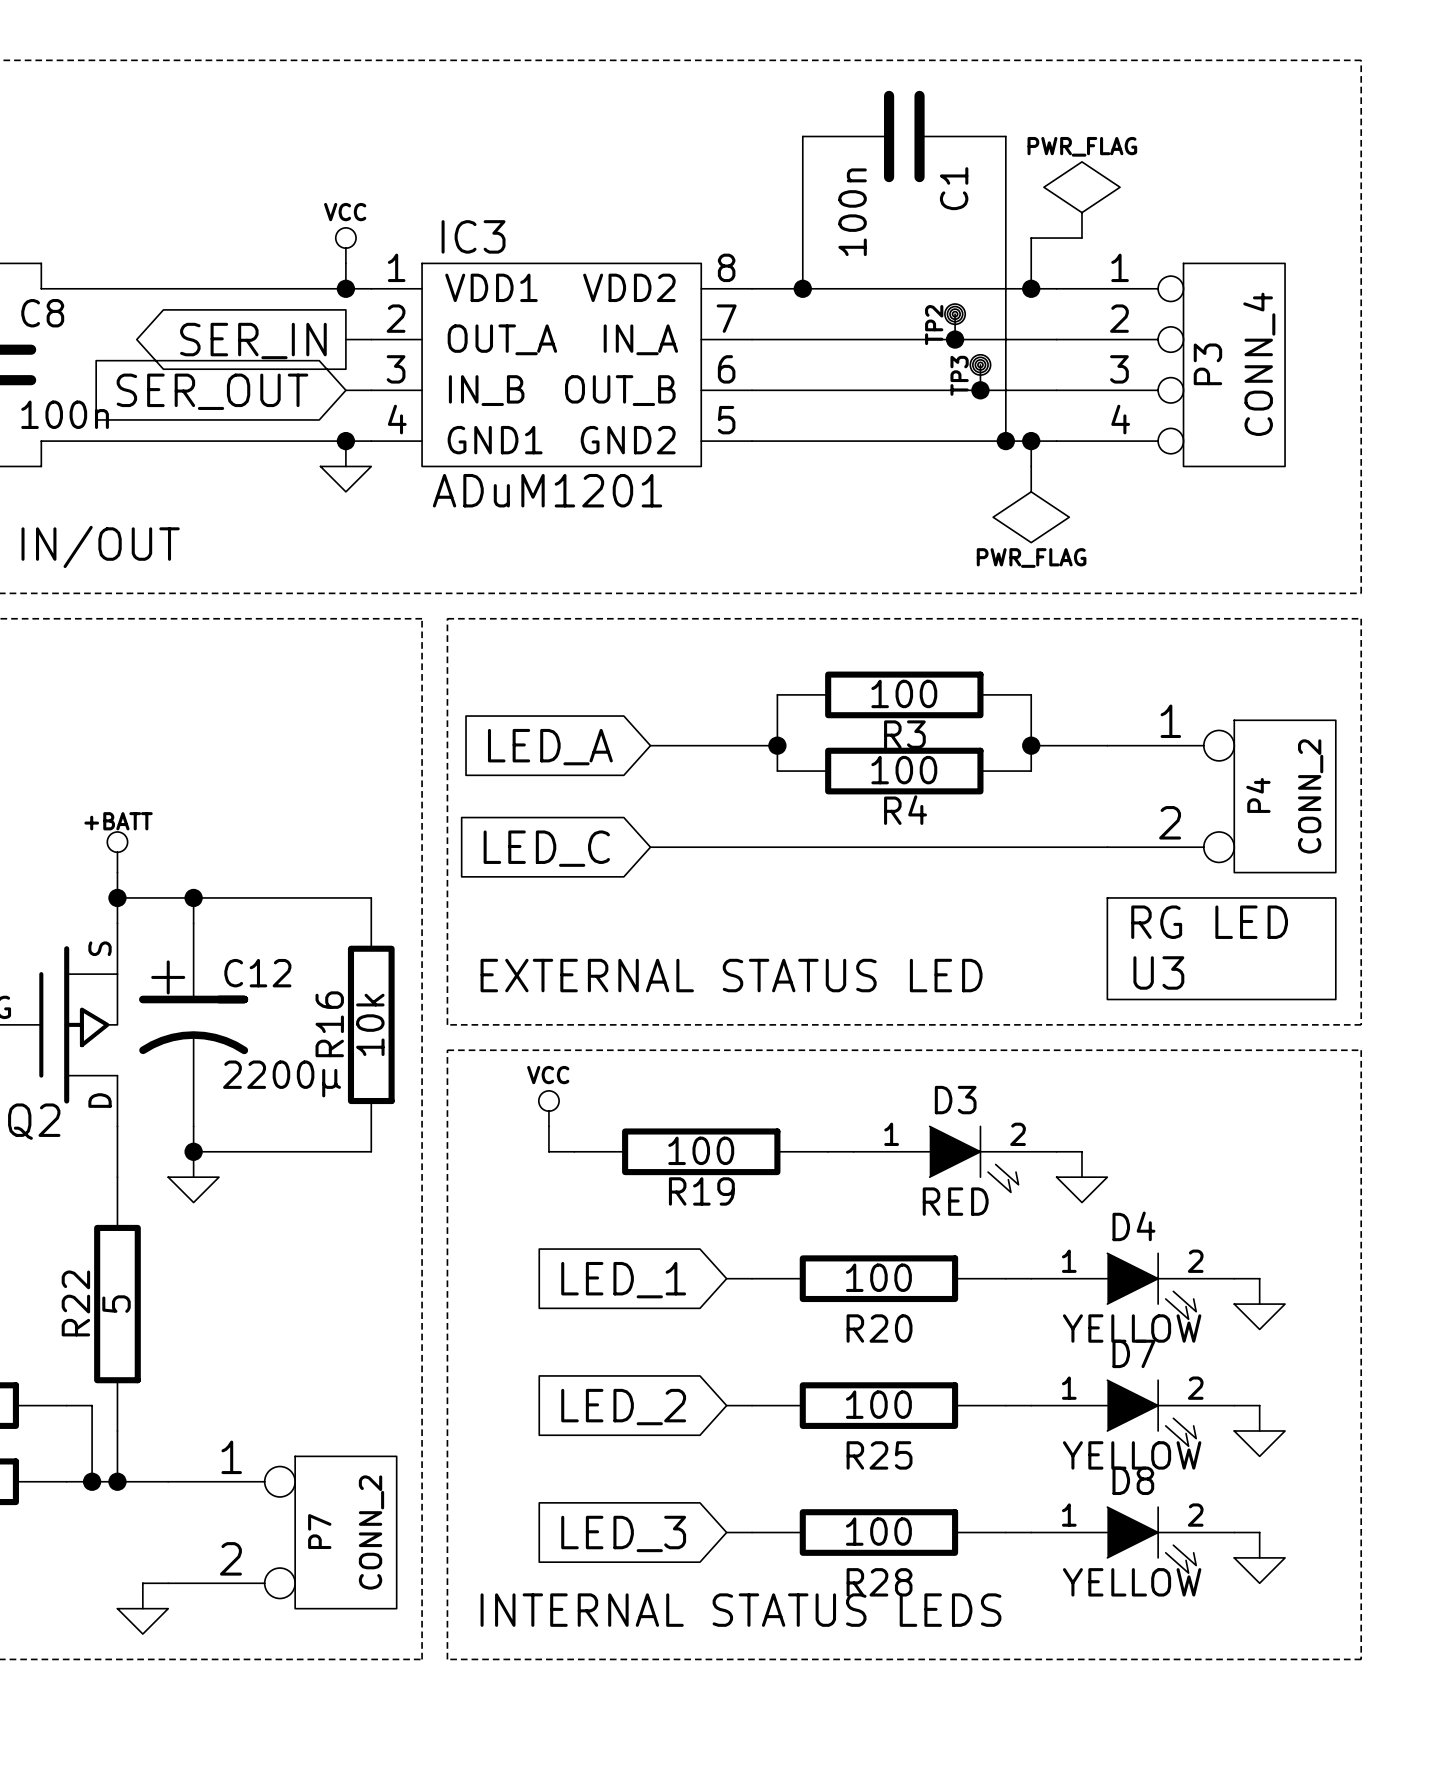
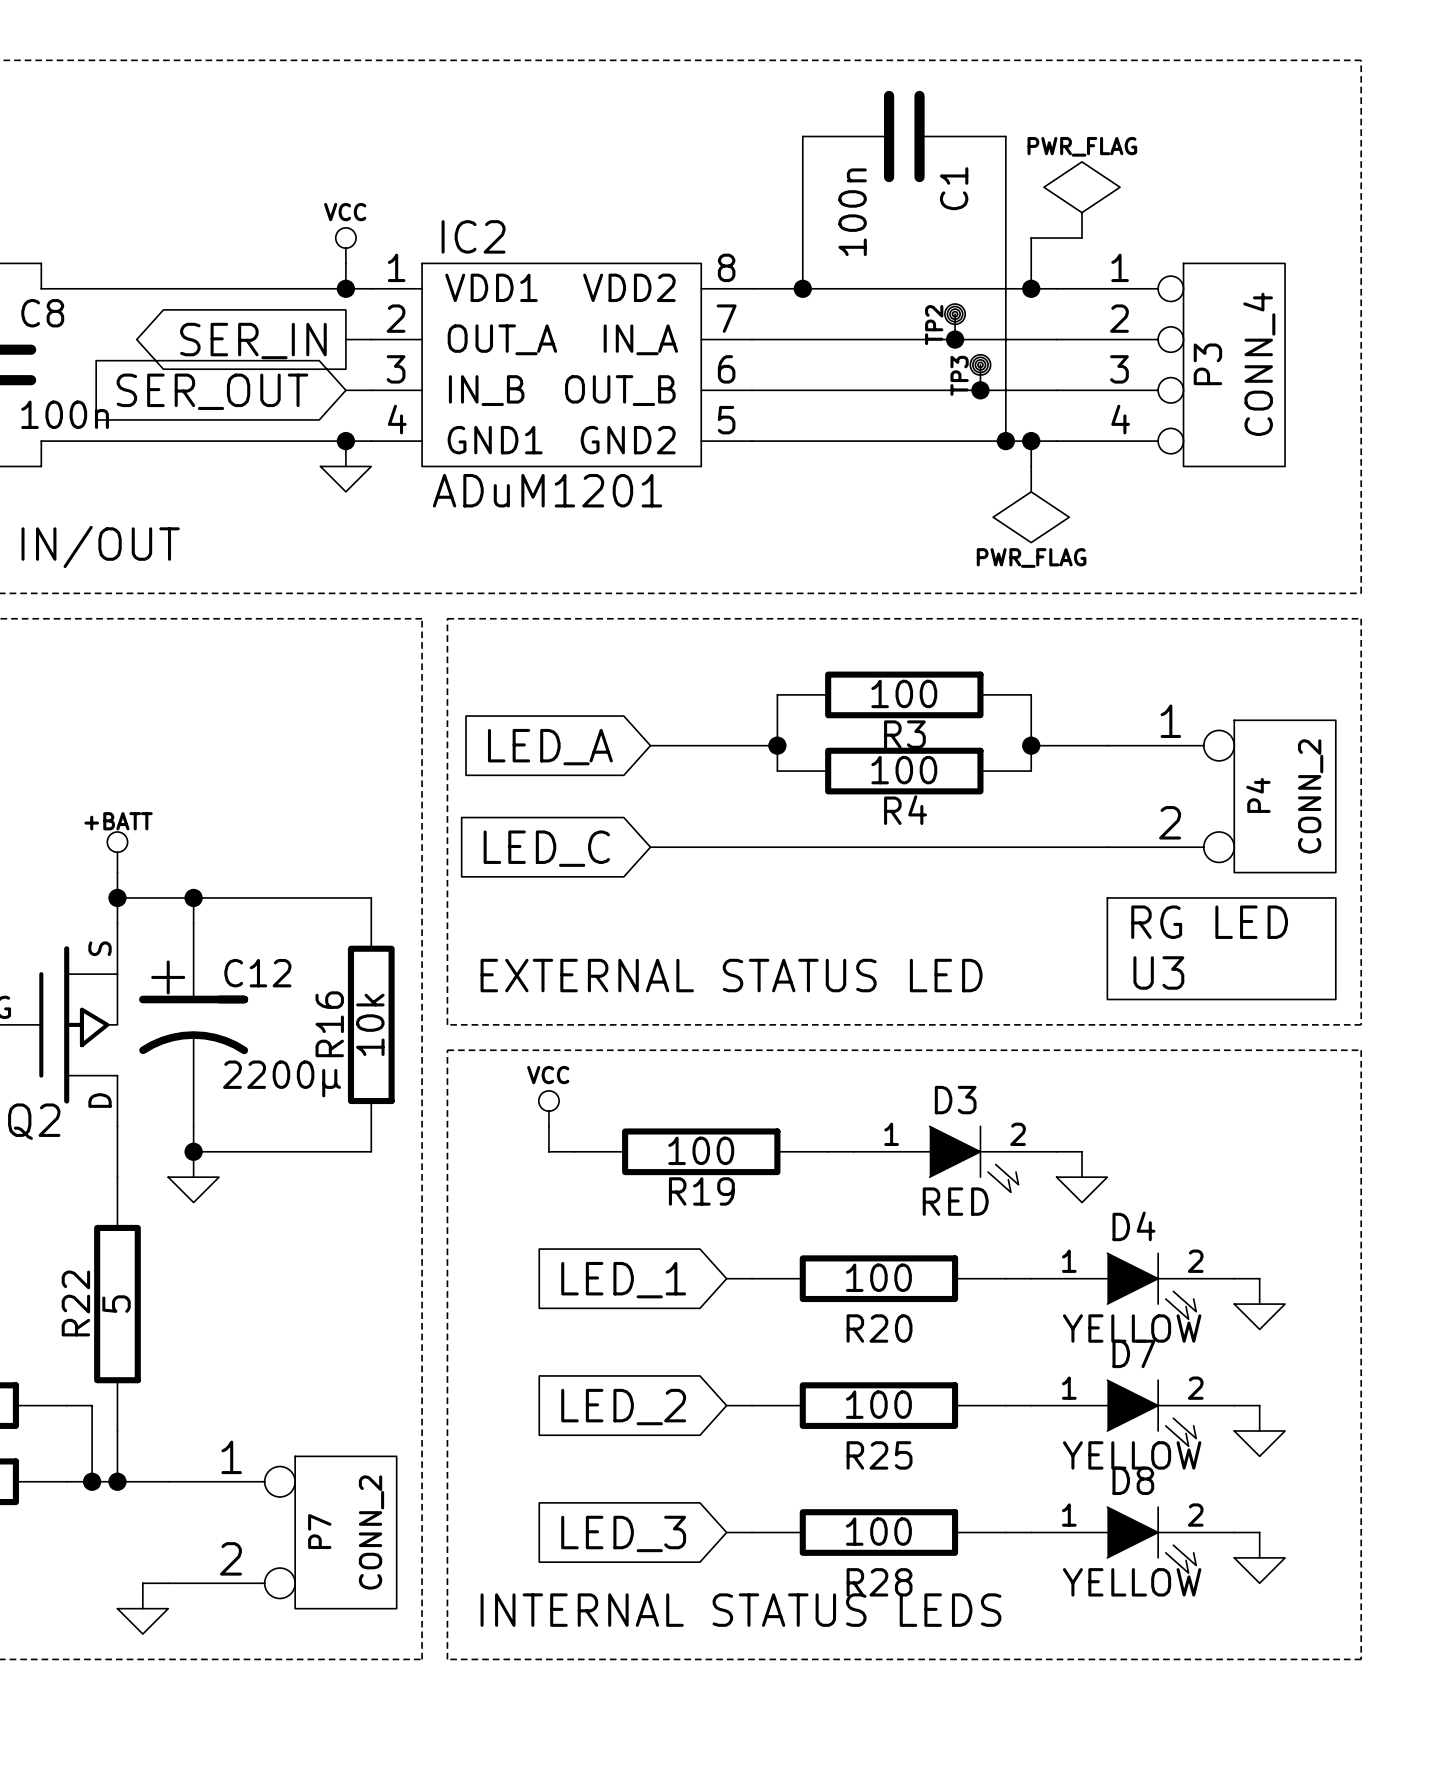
IC3 name: IC3 (473, 236) -> IC2 (473, 236)

